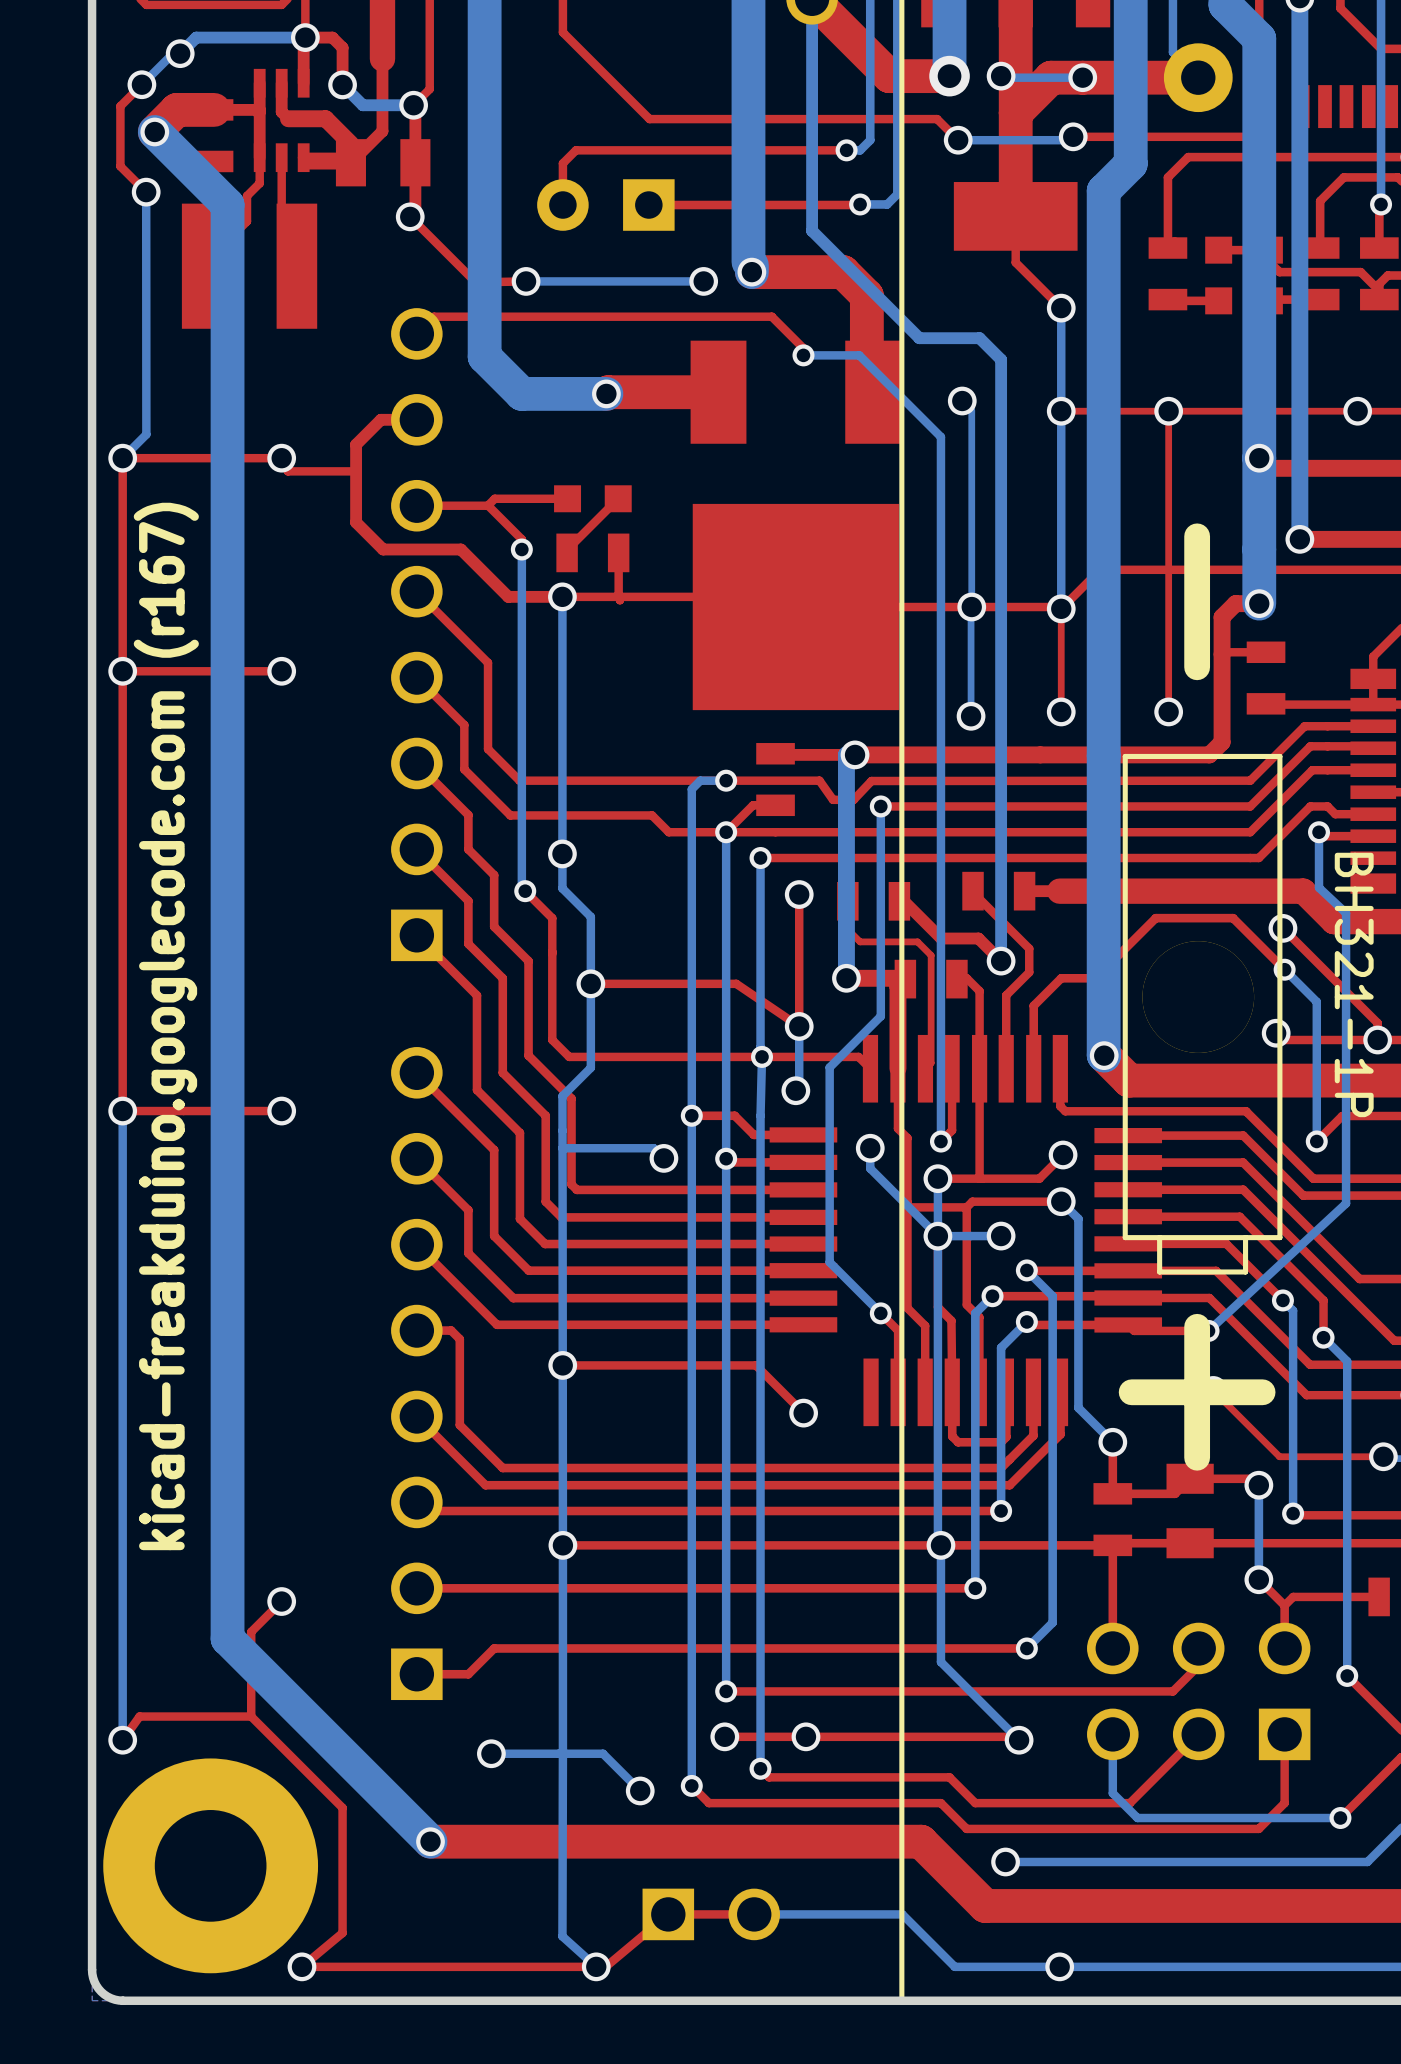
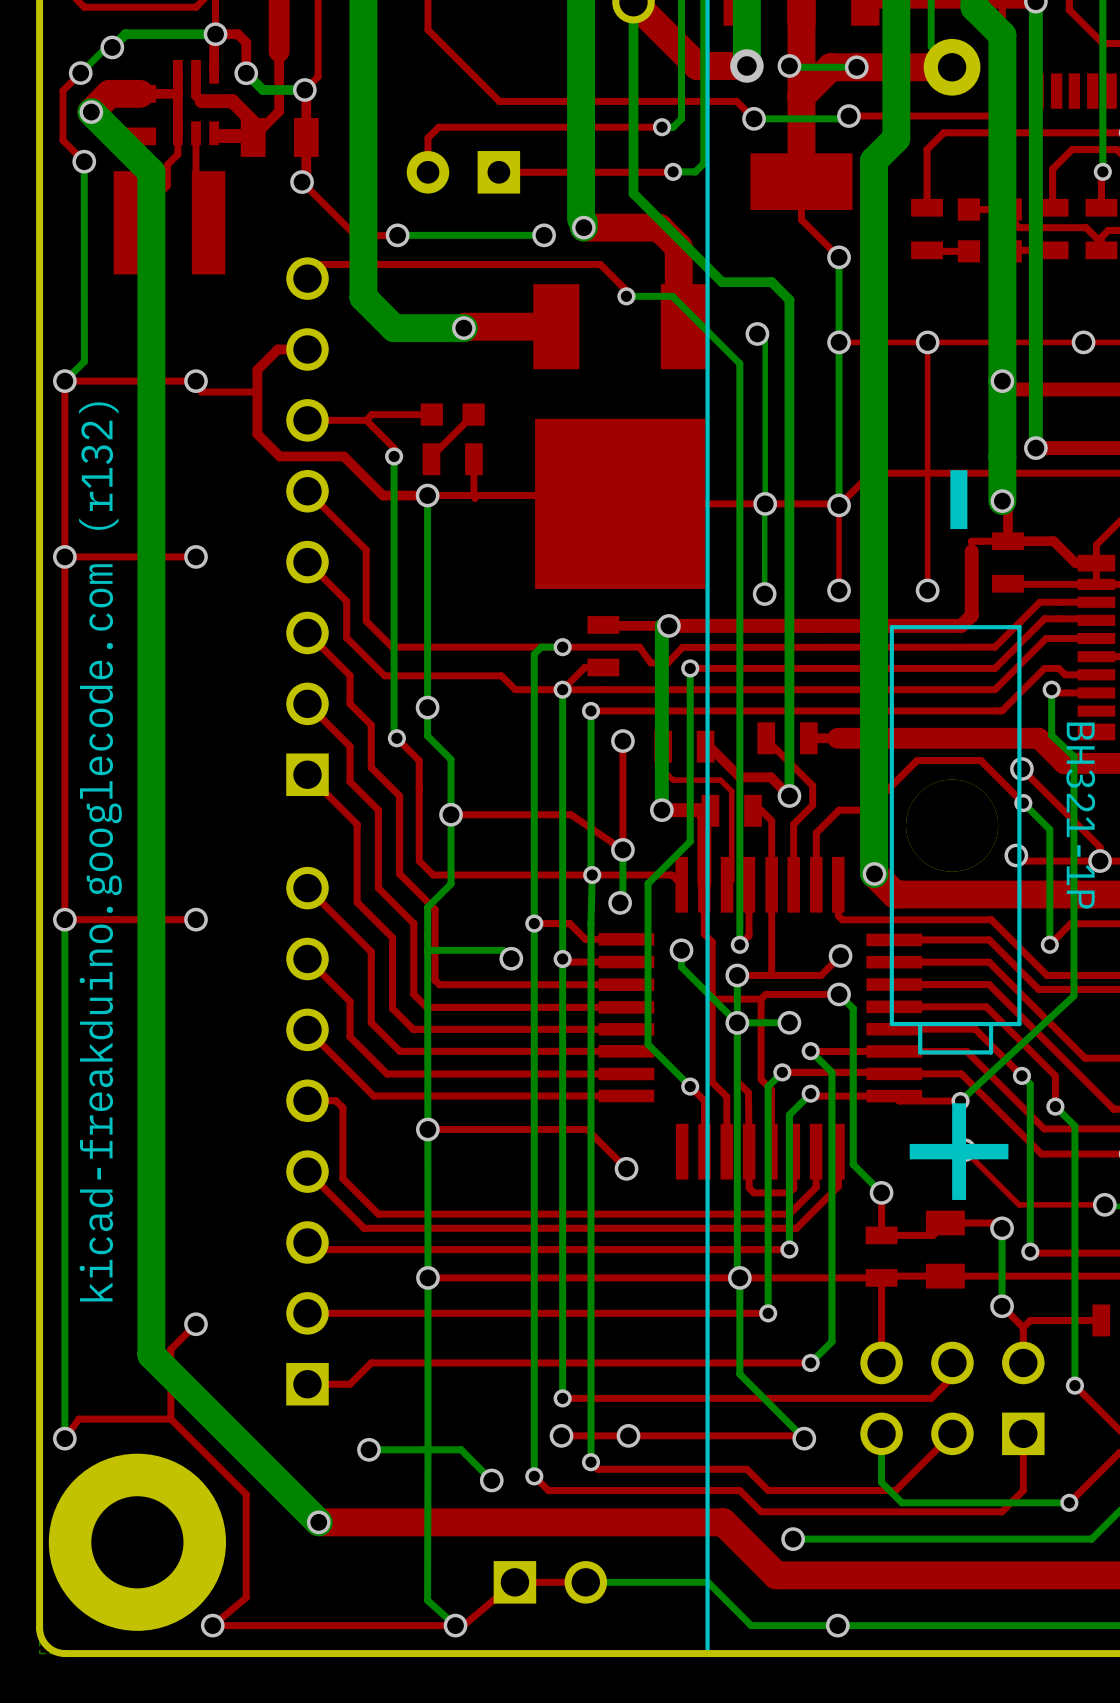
top track: (1259, 603) (1235, 603) (1222, 617) (1222, 664) -> (1002, 501) (1007, 506) (1007, 541) (1053, 541) (1075, 563) (1096, 563)
text: kicad-freakduino.googlecode.com (r167) (166, 1026) -> kicad-freakduino.googlecode.com (r132) (100, 851)

